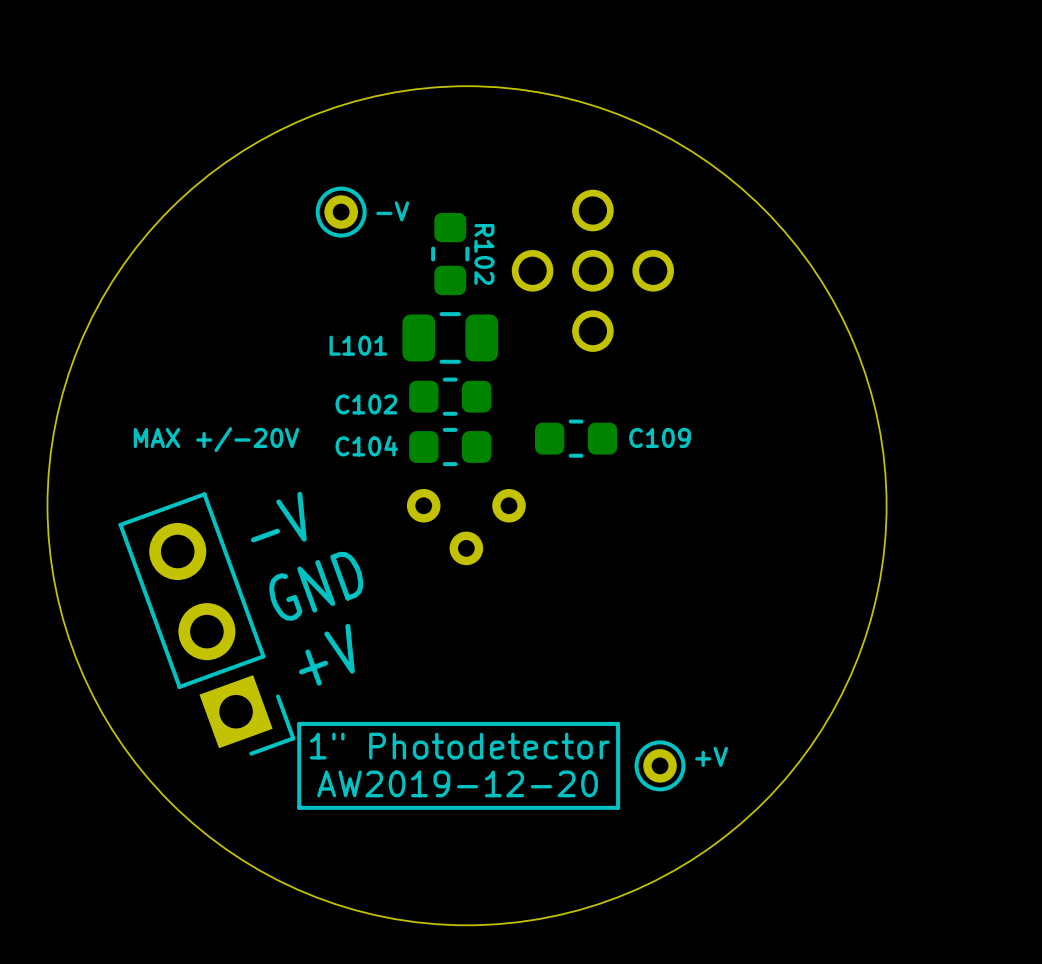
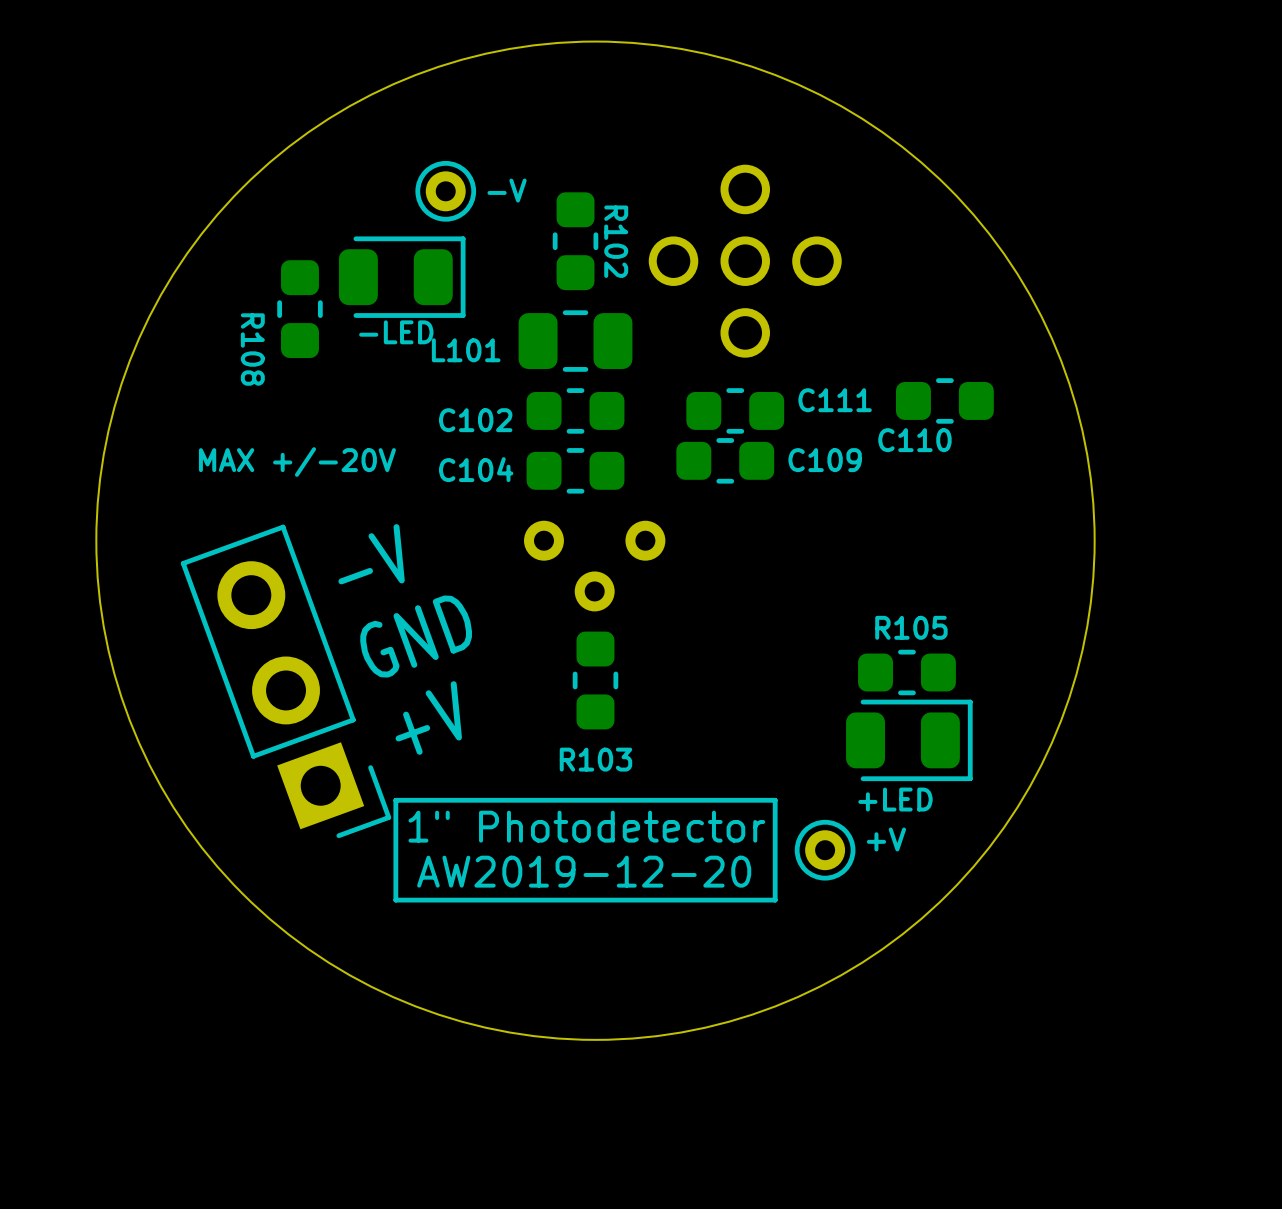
-LED: none -> (402, 277)
R108: none -> (299, 309)
C110: none -> (944, 400)
C111: none -> (735, 410)
R105: none -> (906, 672)
R103: none -> (595, 680)
+LED: none -> (909, 740)

